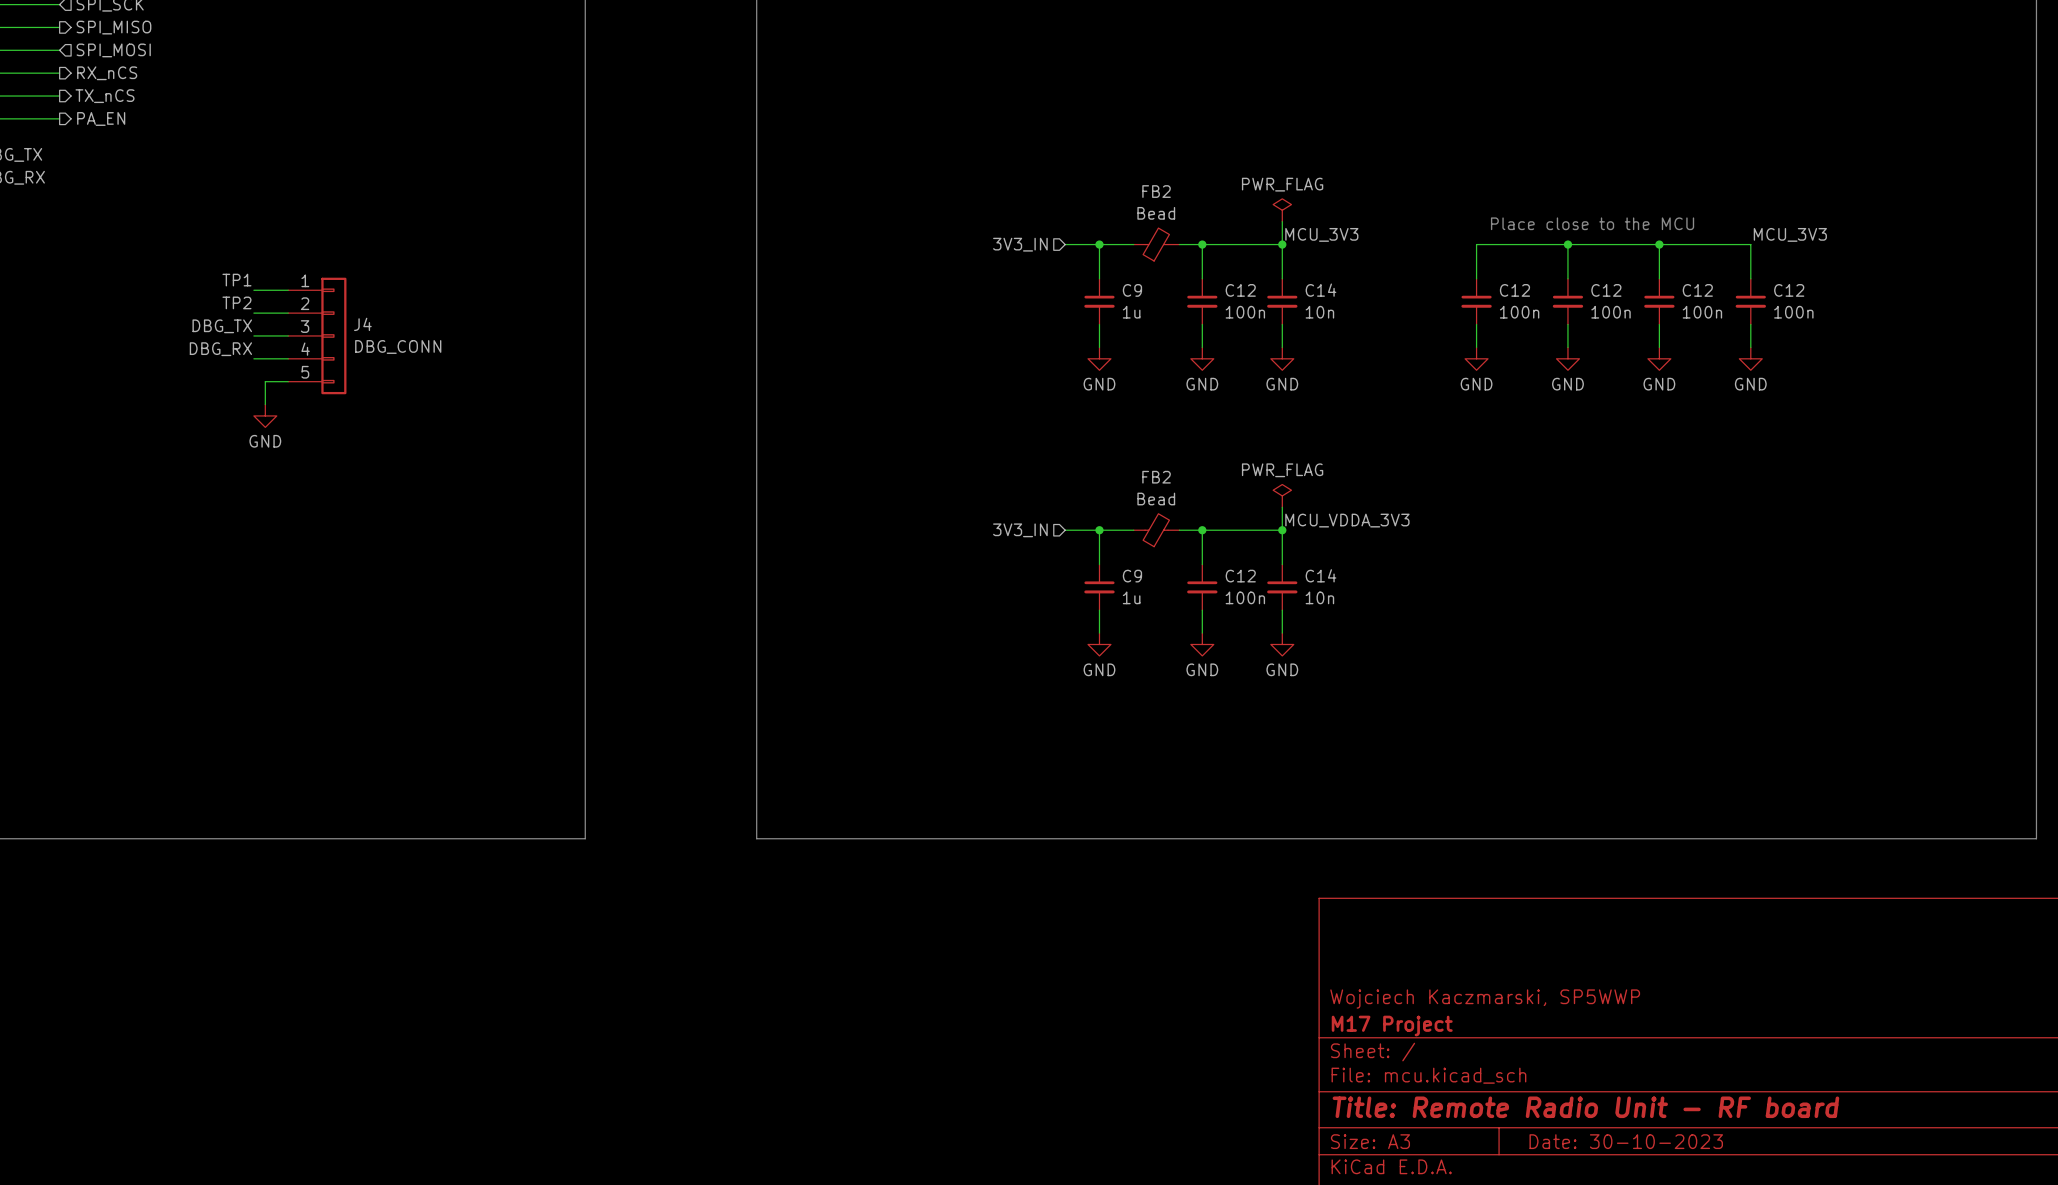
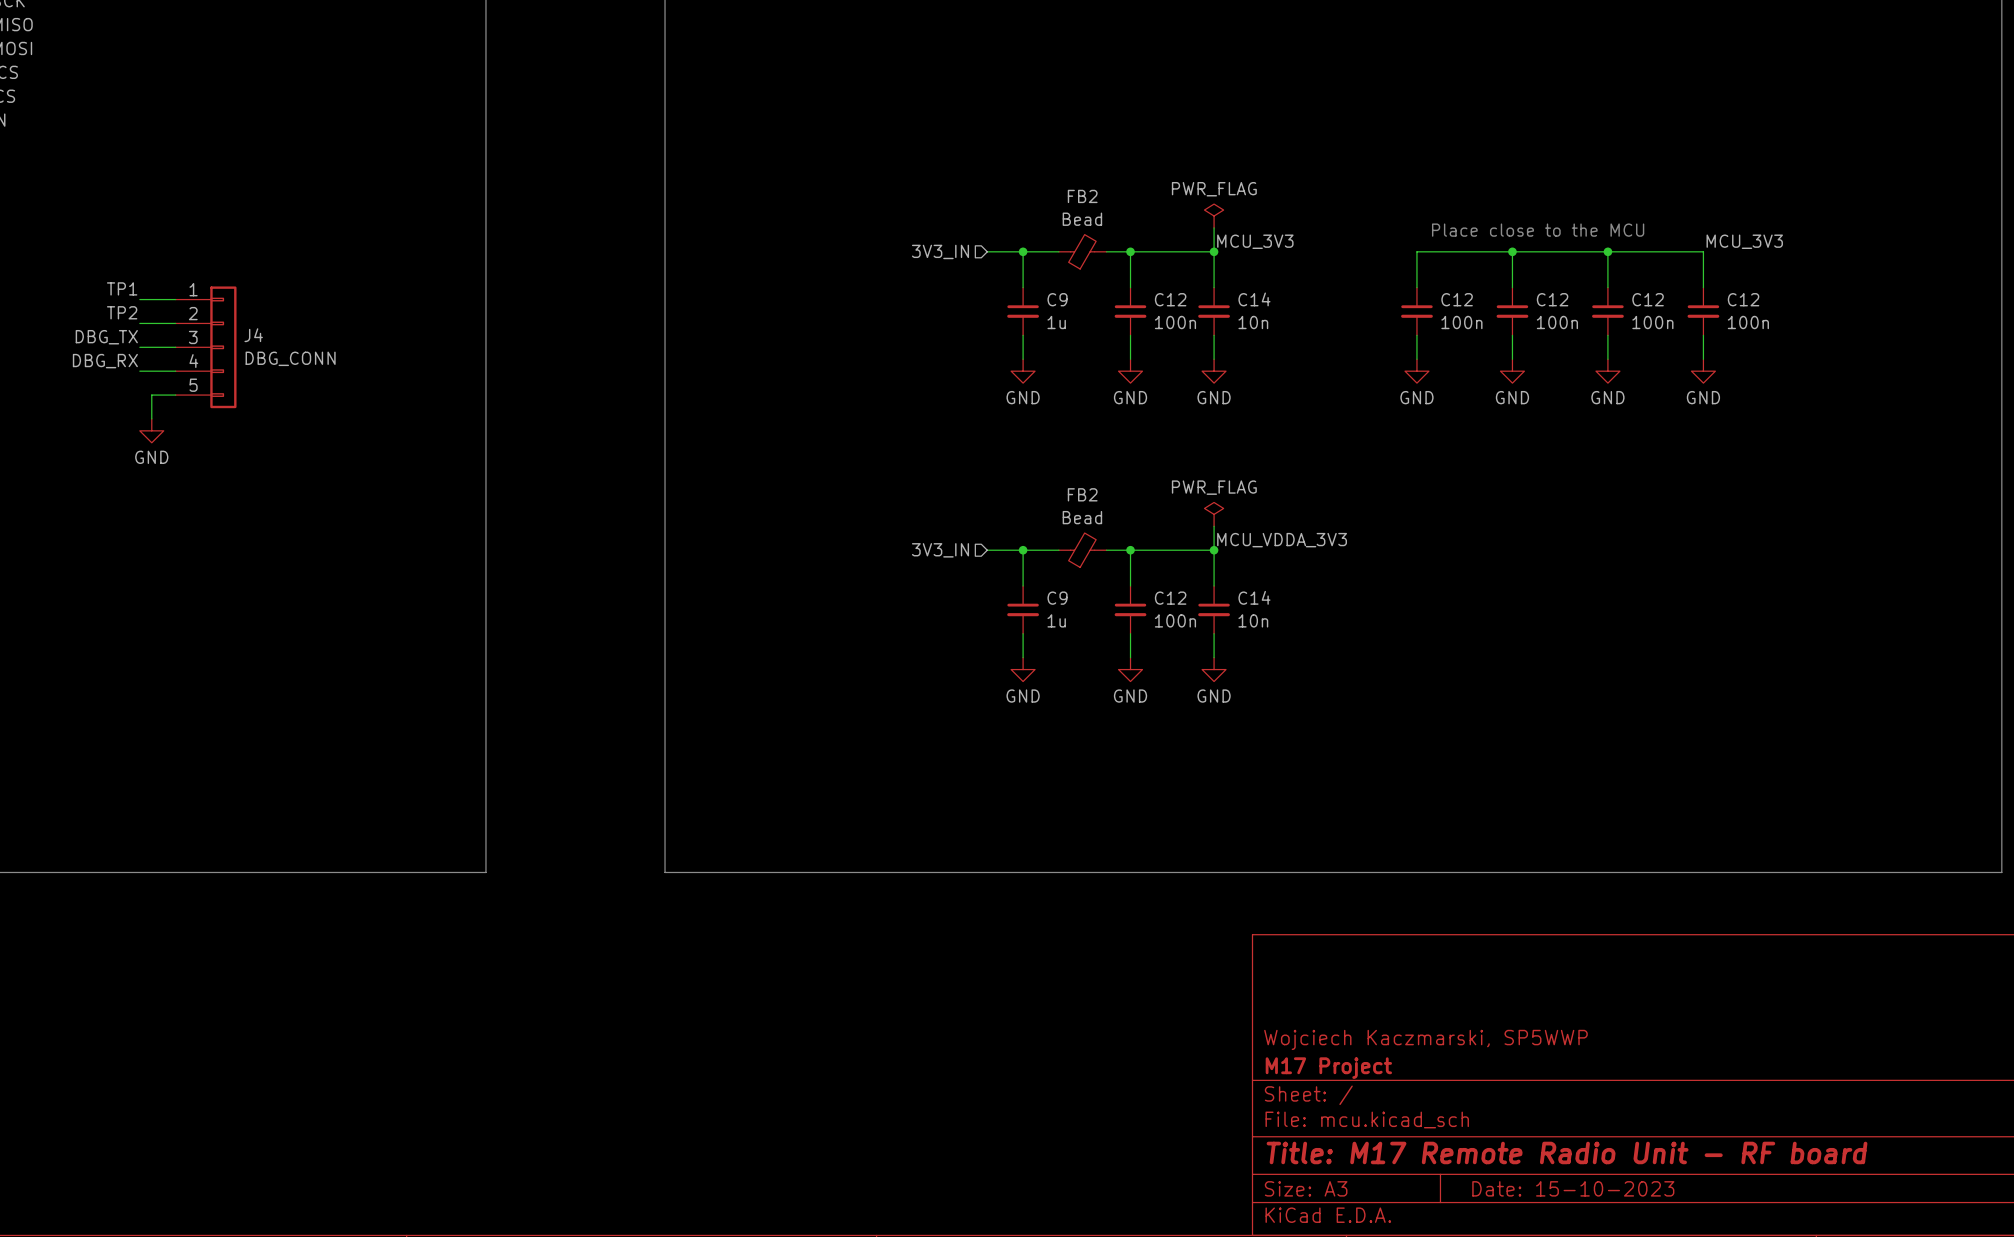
title block: Title: Remote Radio Unit - RF board (1585, 1107) -> Title: M17 Remote Radio Unit - RF board (1567, 1152)
title block: Date: 30-10-2023 (1626, 1141) -> Date: 15-10-2023 (1573, 1188)

